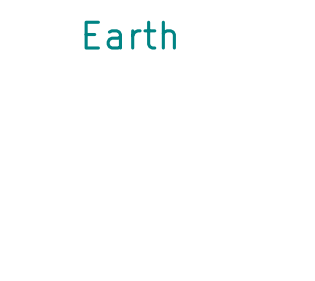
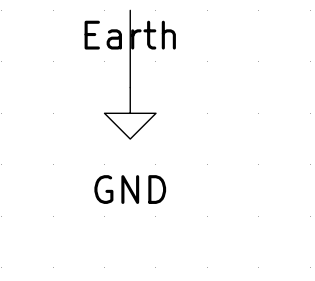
wire: none -> (130, 10) (130, 87)
power symbol: none -> GND (130, 113)

